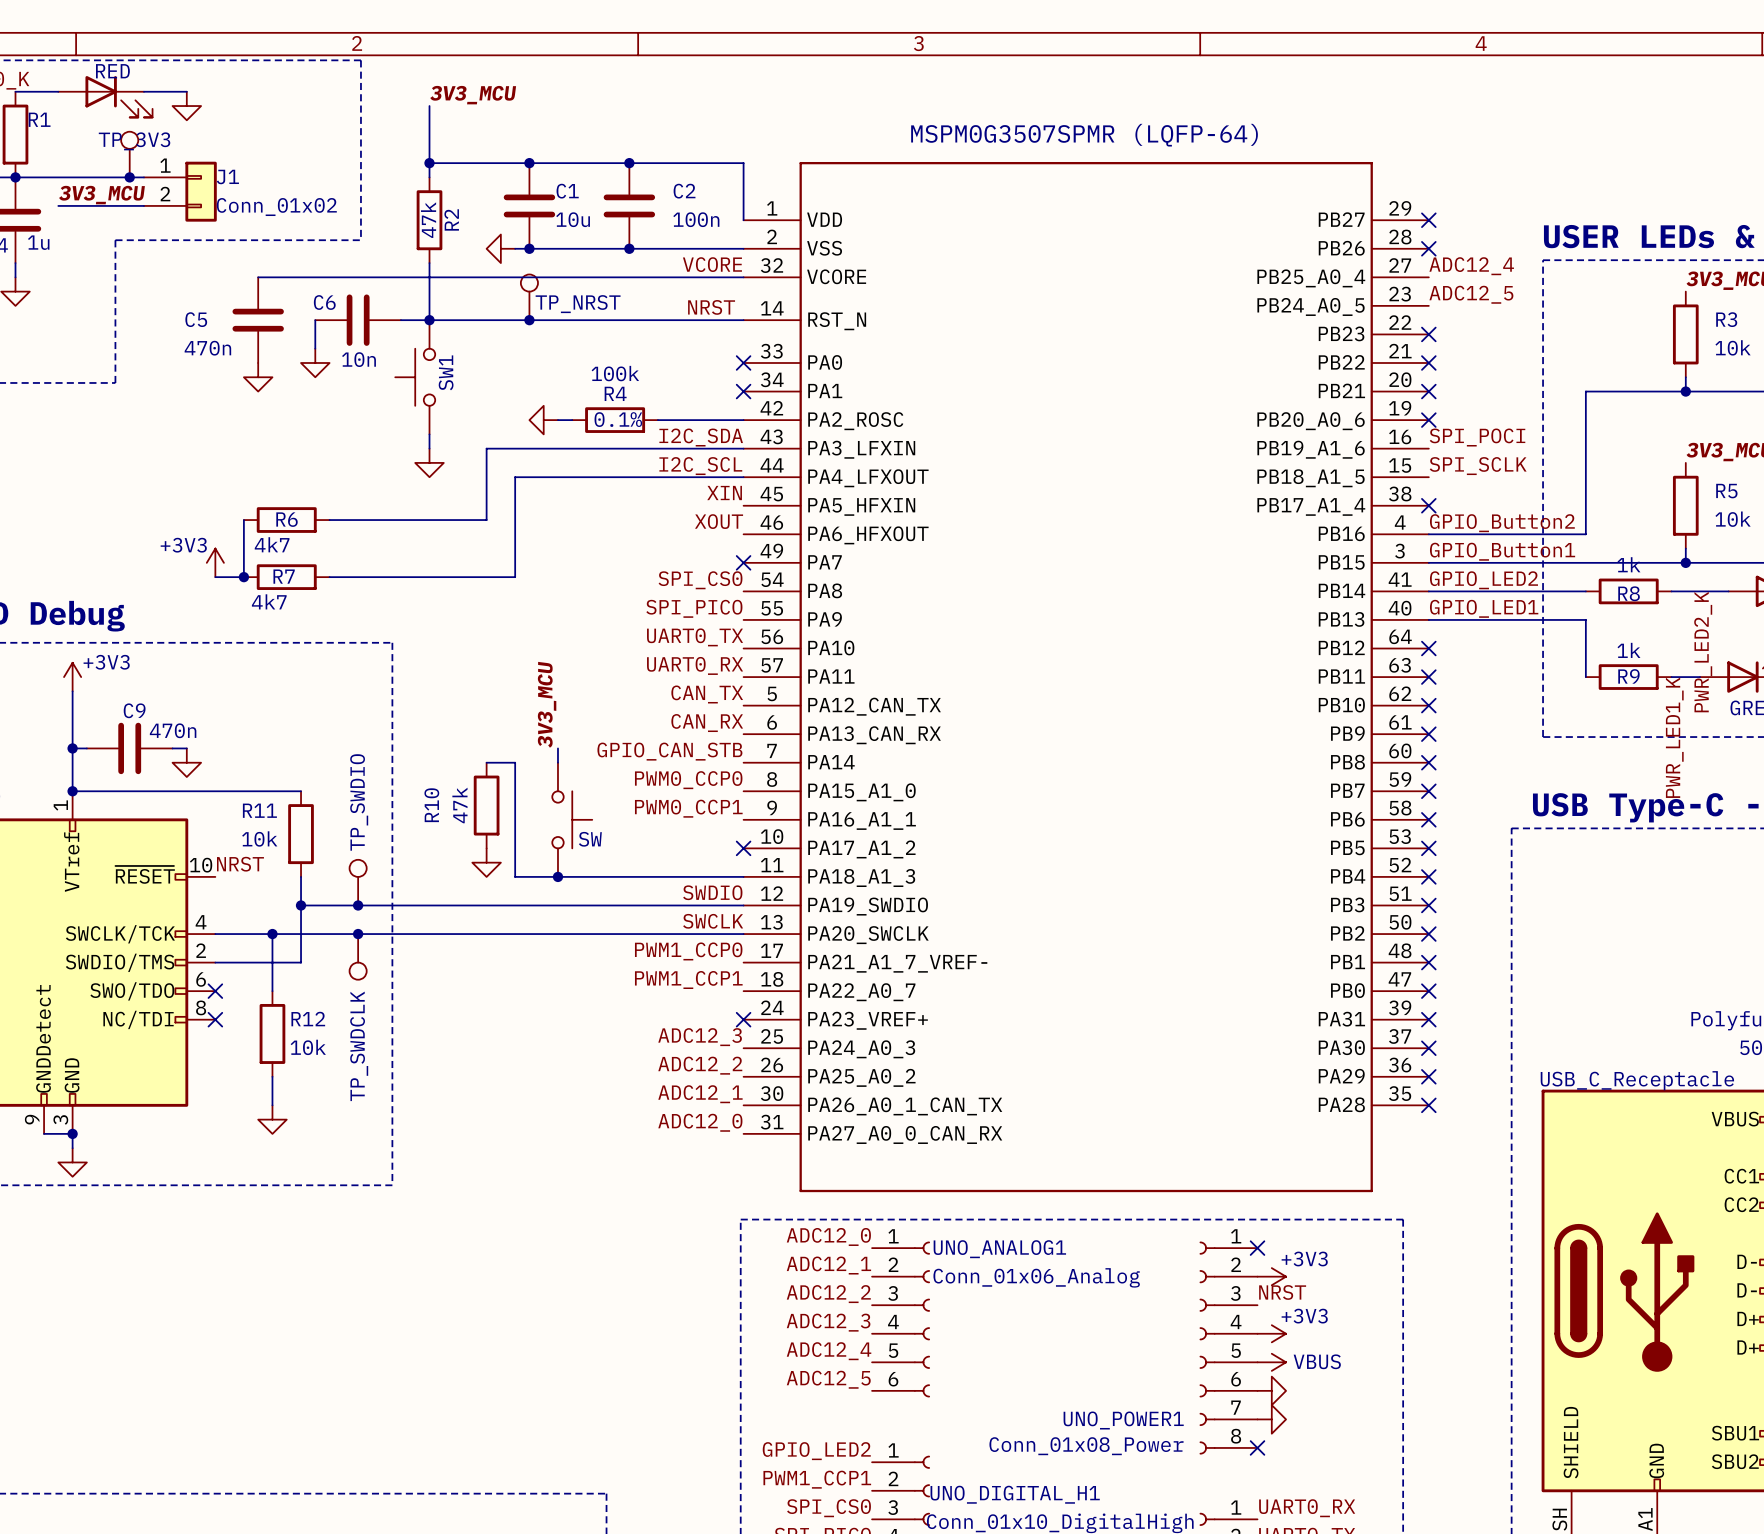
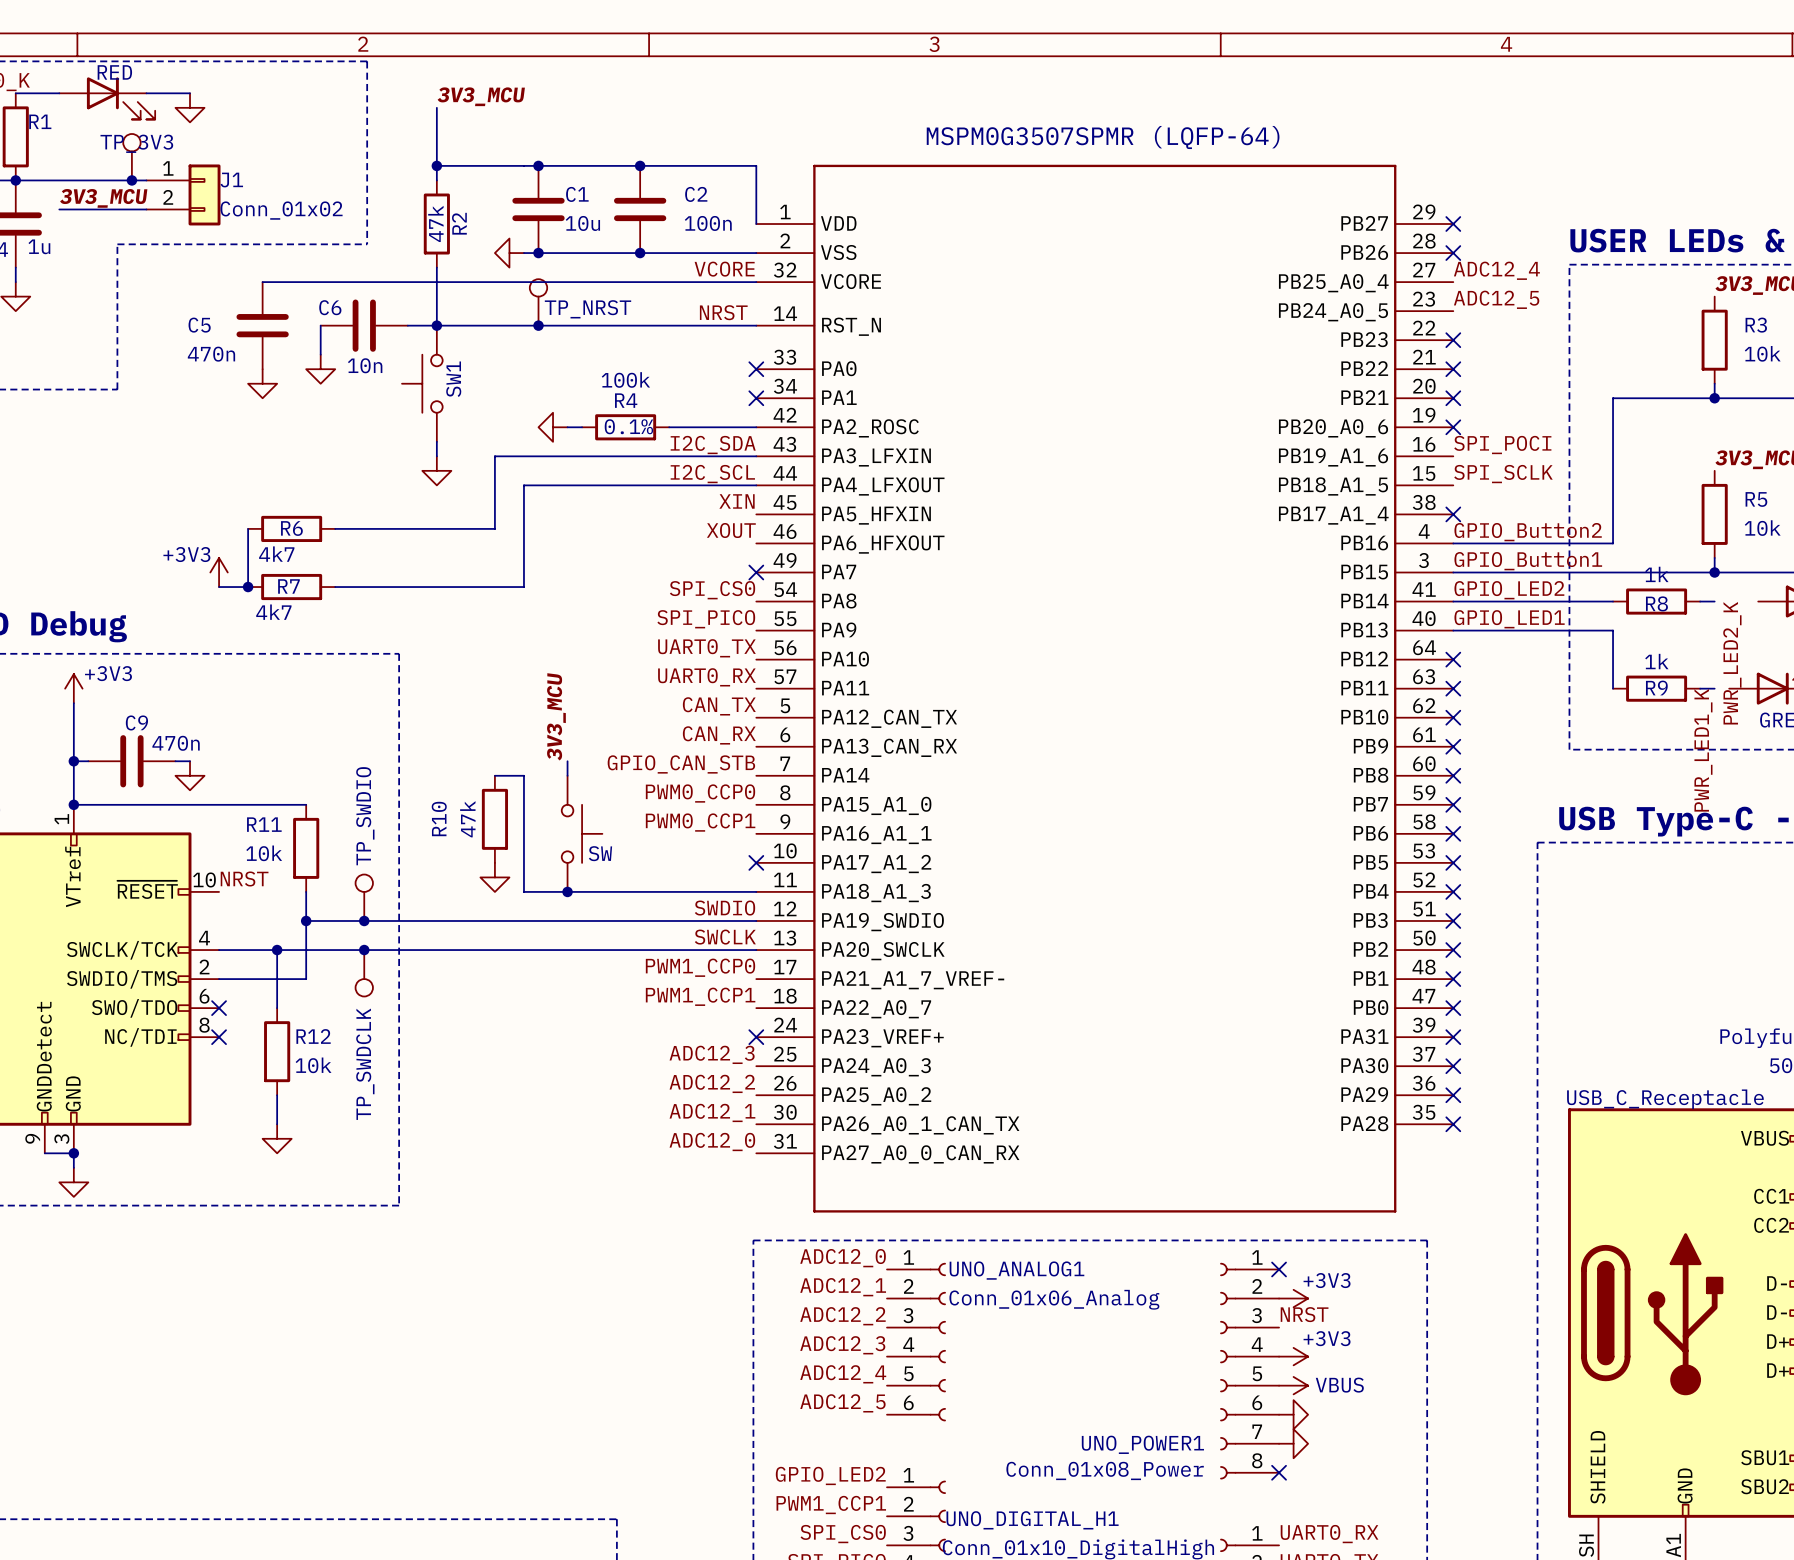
wire: (1685, 591) (1728, 591) -> none
wire: (1685, 677) (1700, 677) -> none

